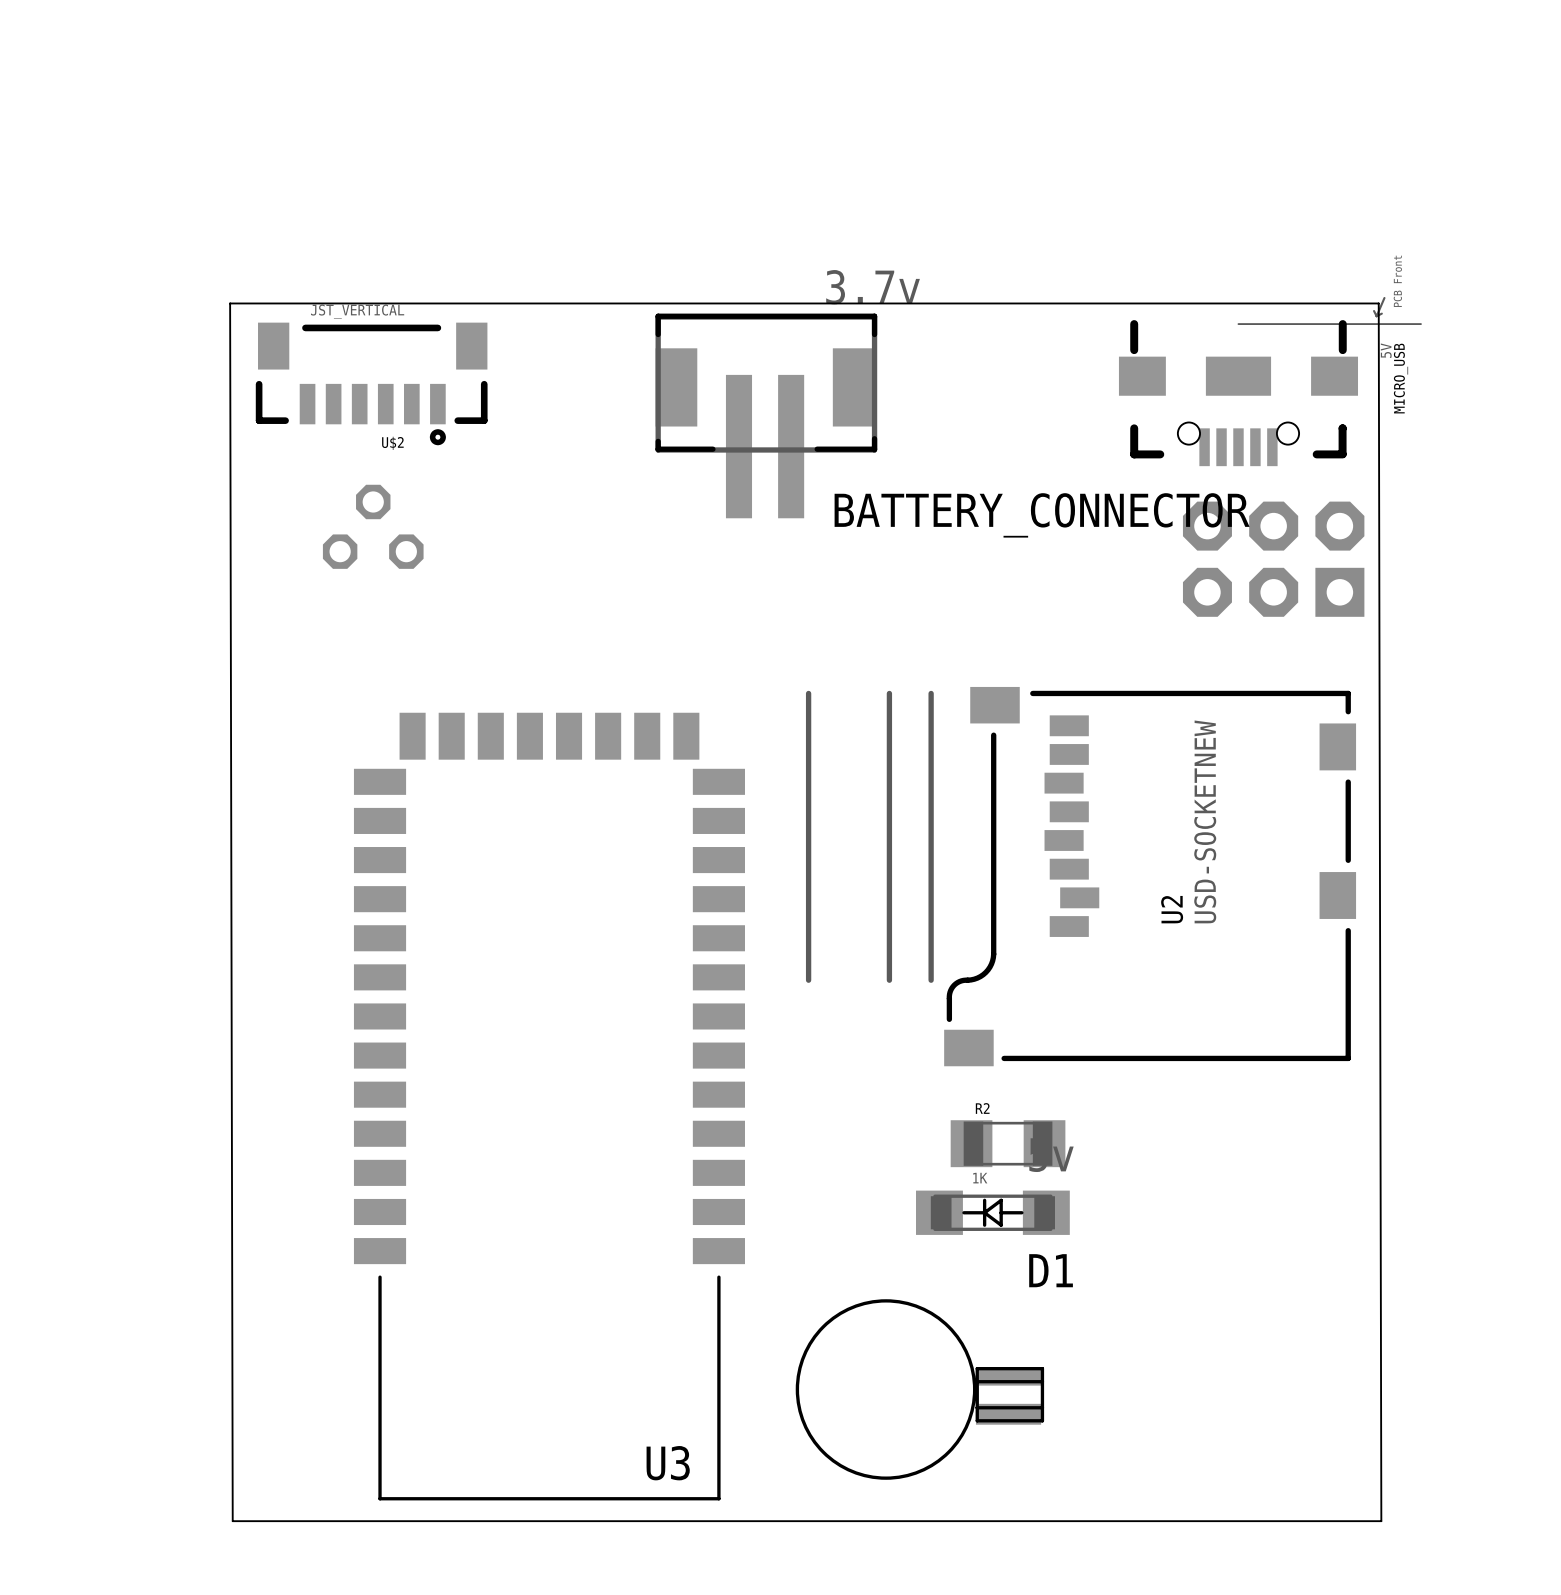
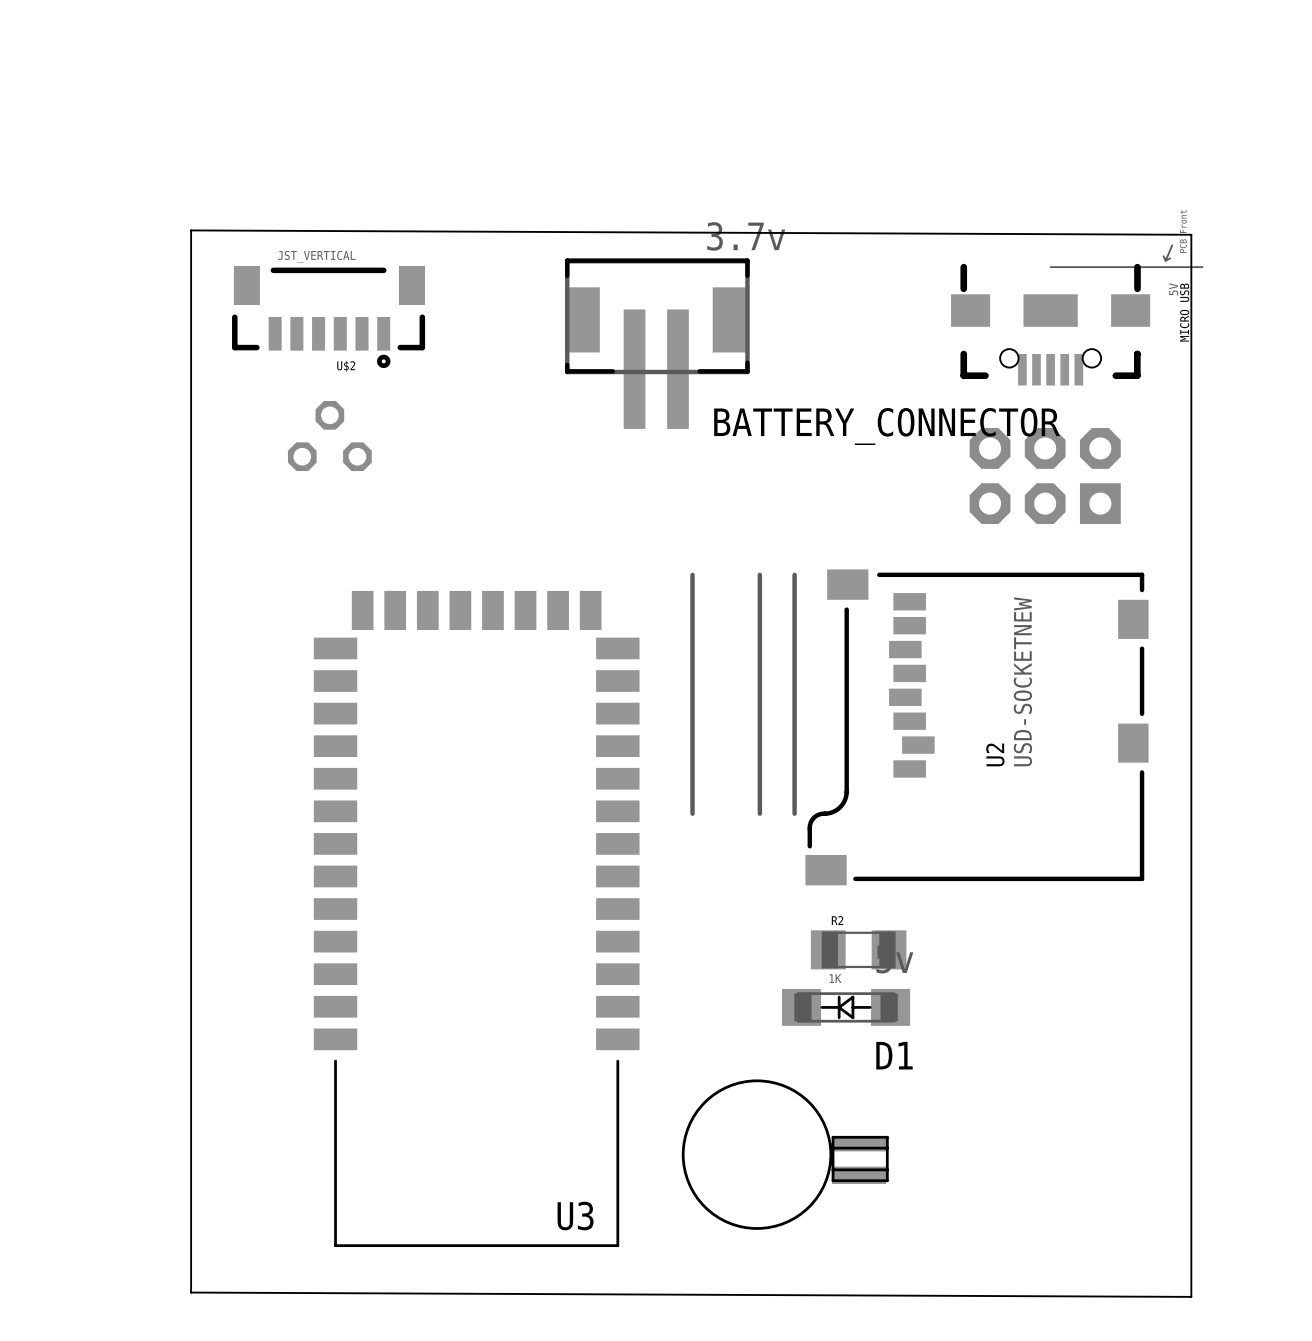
board edge: (1378, 303) (230, 303) (232, 1521) (1381, 1521) (1378, 303) -> (191, 230) (1191, 234) (1191, 1296) (191, 1292) (191, 230)
part position: (1273, 559) -> (1045, 476)

